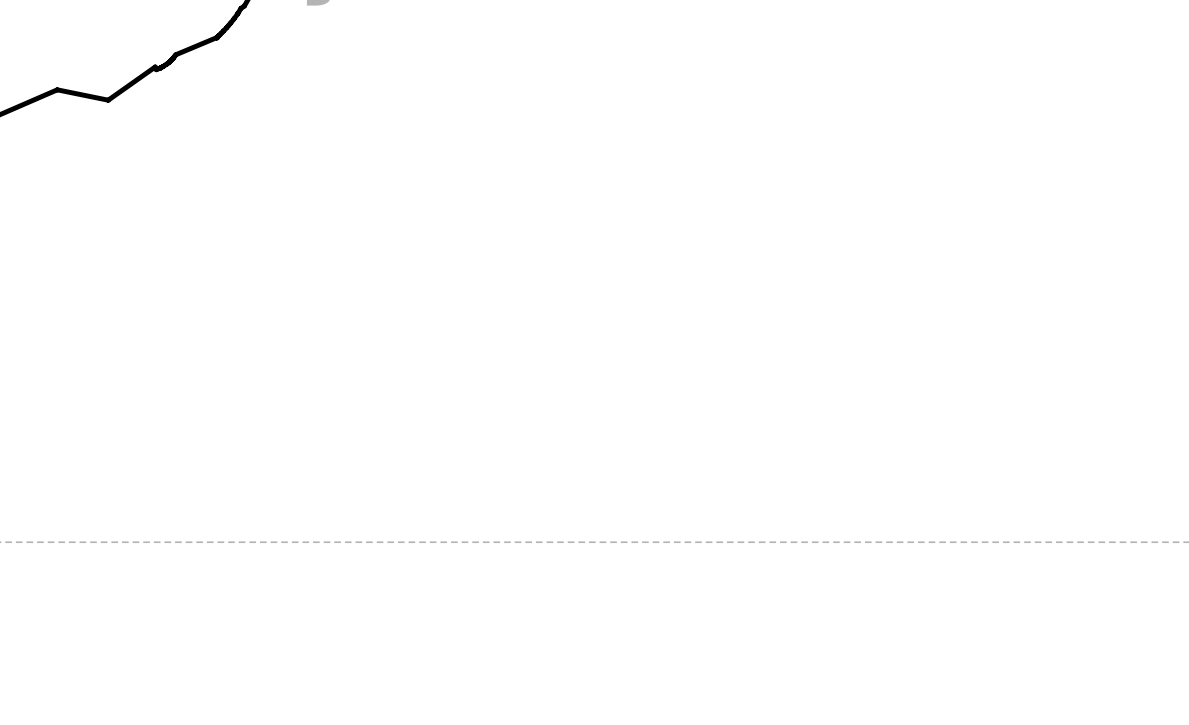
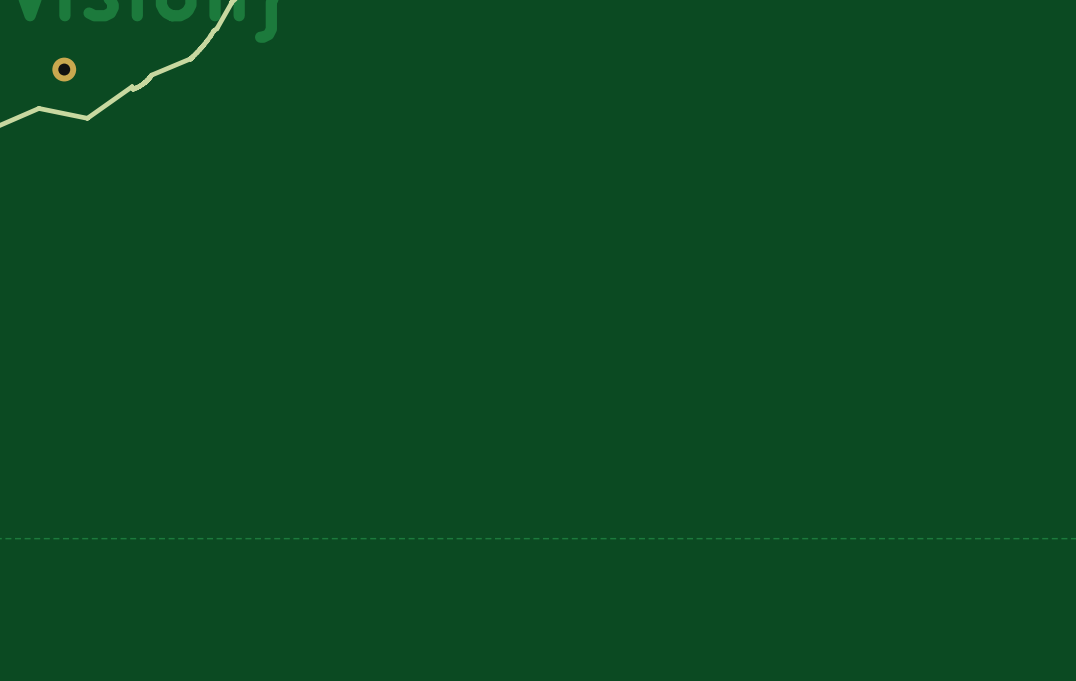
via: none -> (64, 69)

